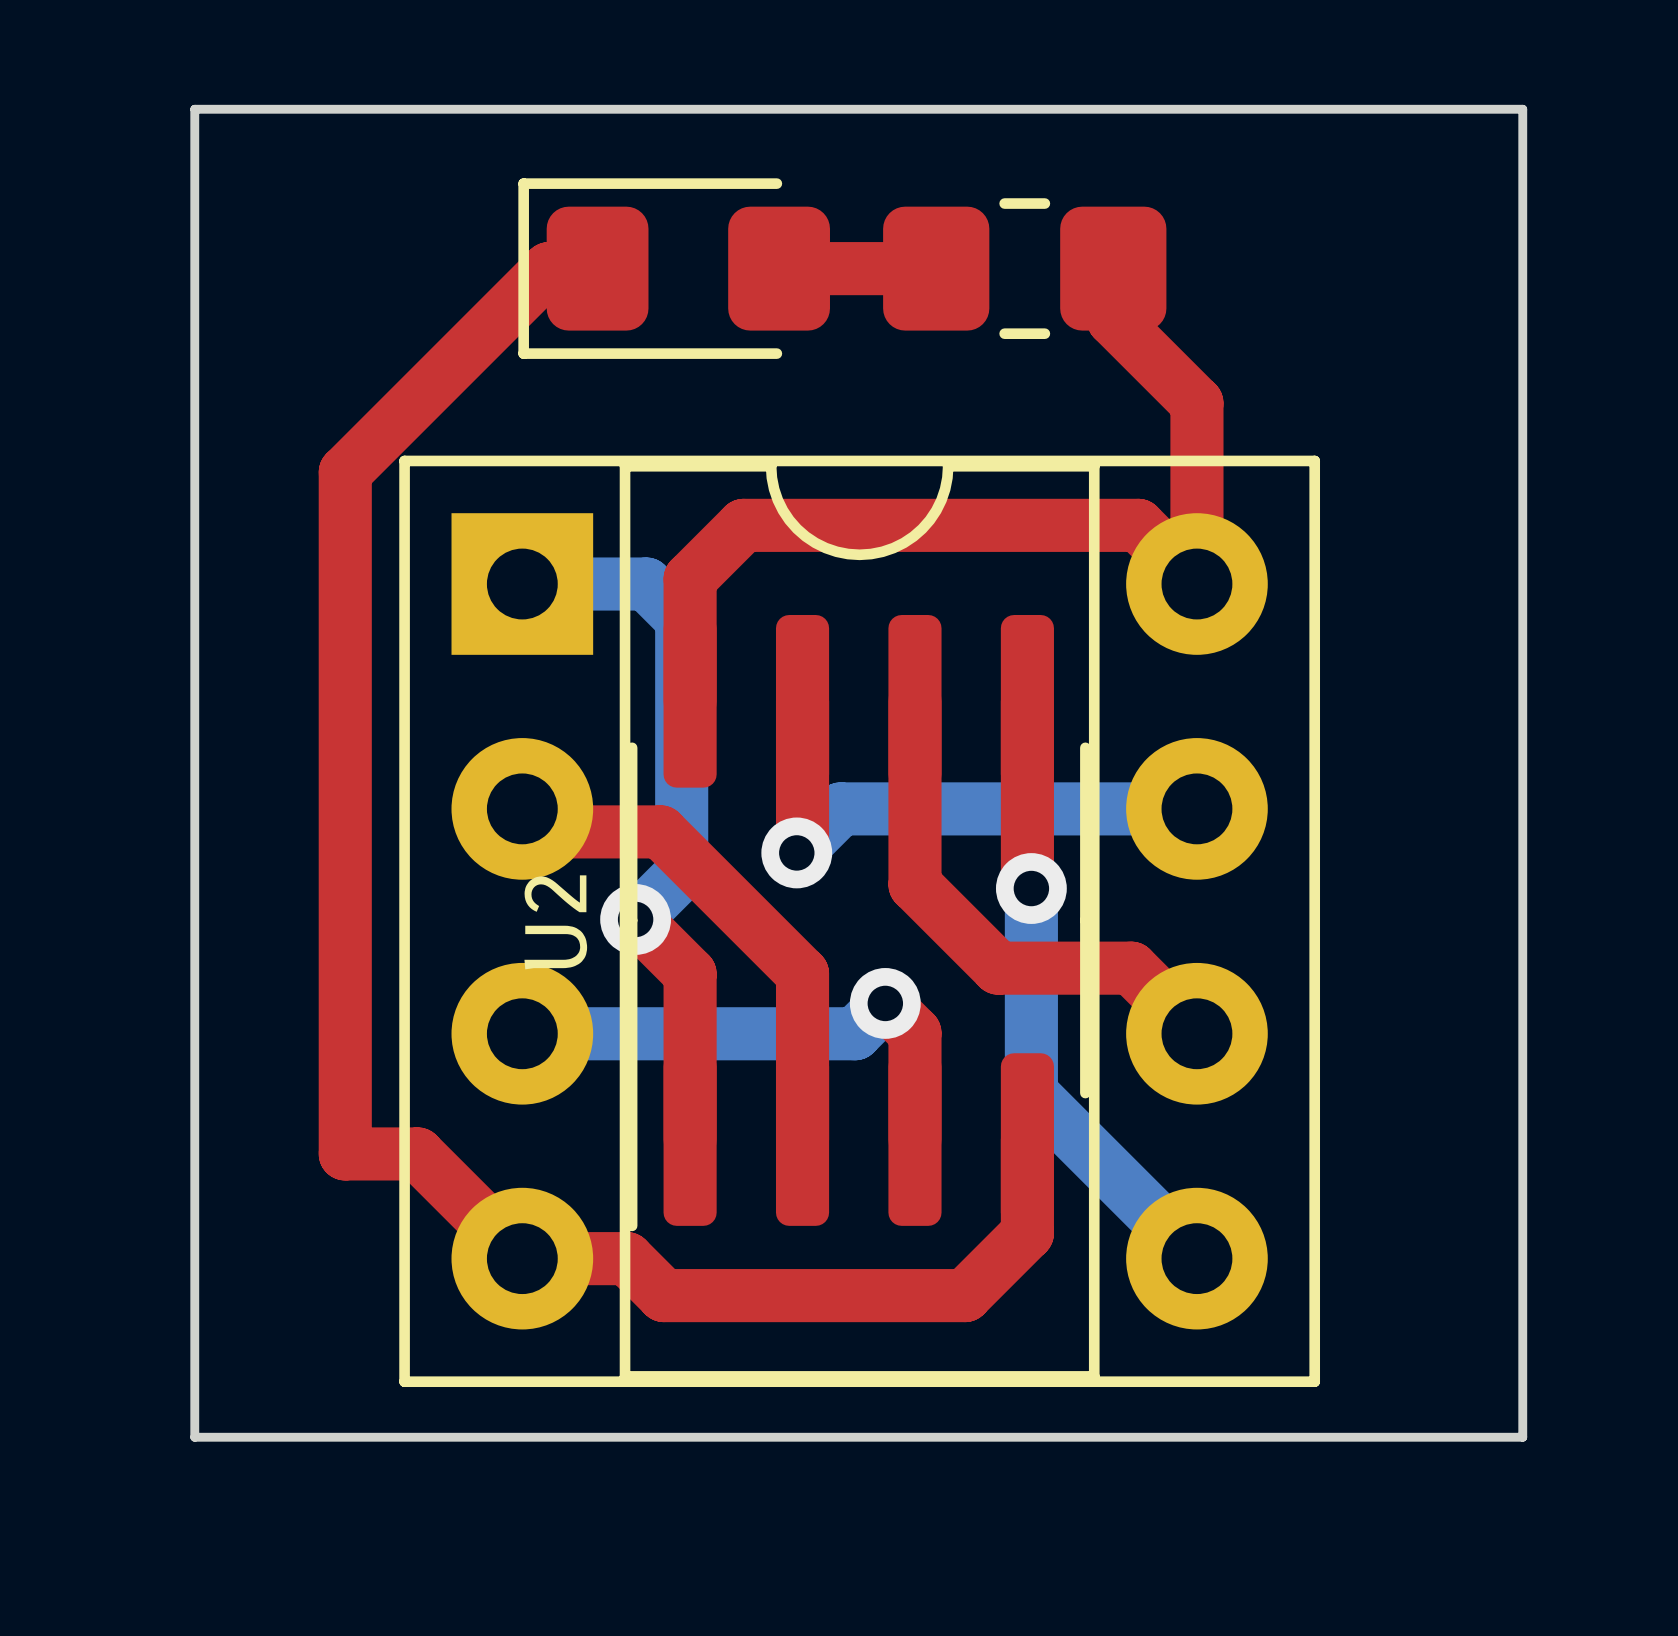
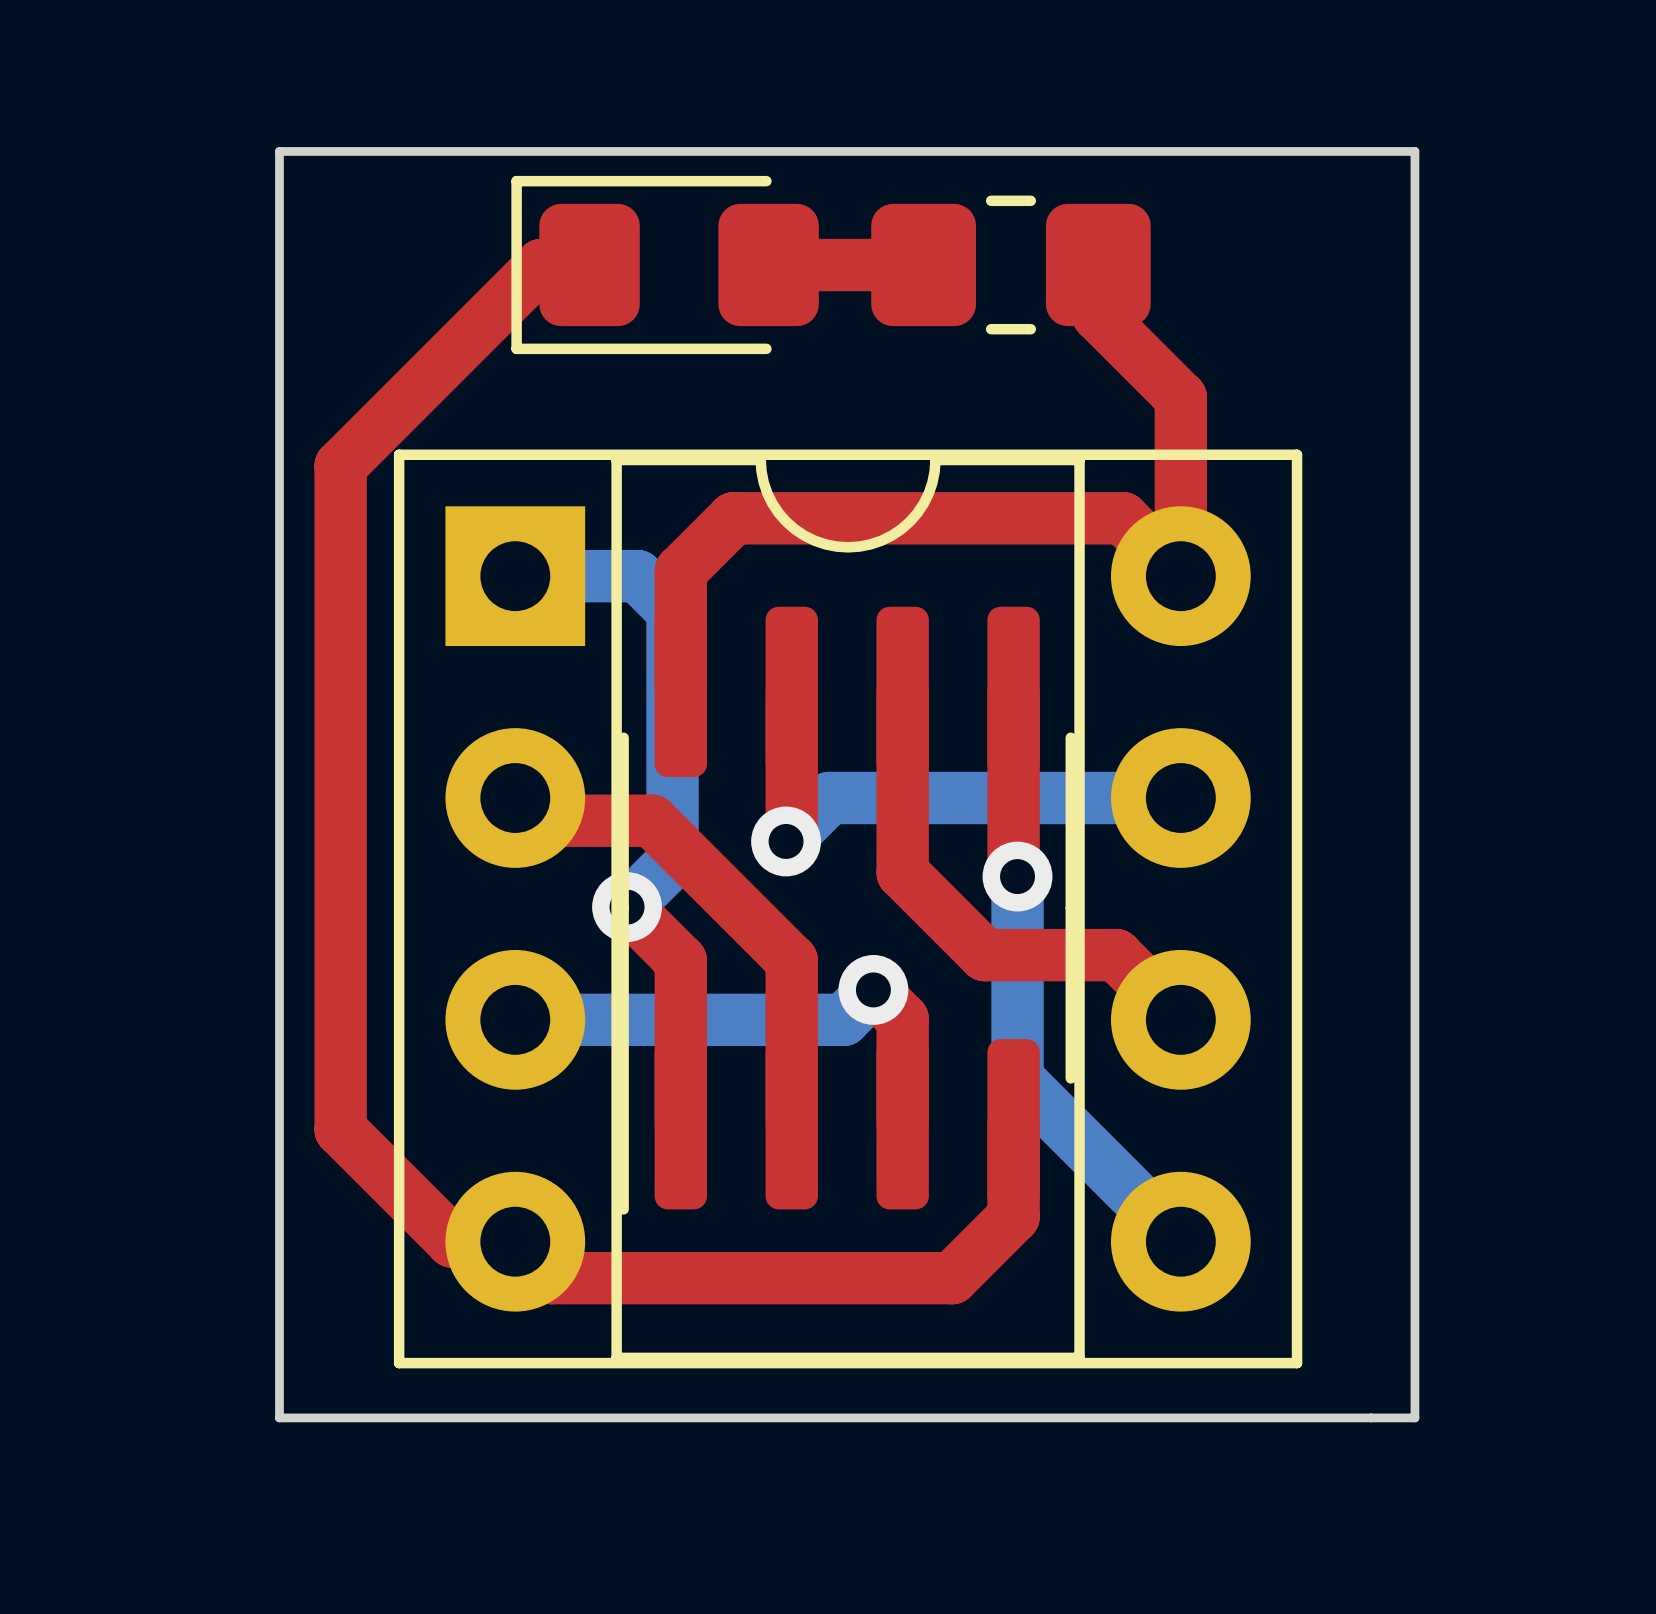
U2 name: U2 (555, 922) -> none
top track: (345, 1145) (345, 1153) (417, 1153) (522, 1258) (627, 1258) (663, 1295) -> (340, 1129) (452, 1241) (515, 1241) (551, 1278) (655, 1278)
board edge: (283, 1437) (194, 1437) (194, 109) (1522, 109) (1522, 1437) (1434, 1437) -> (279, 1417) (279, 151) (1414, 151) (1414, 1417)

